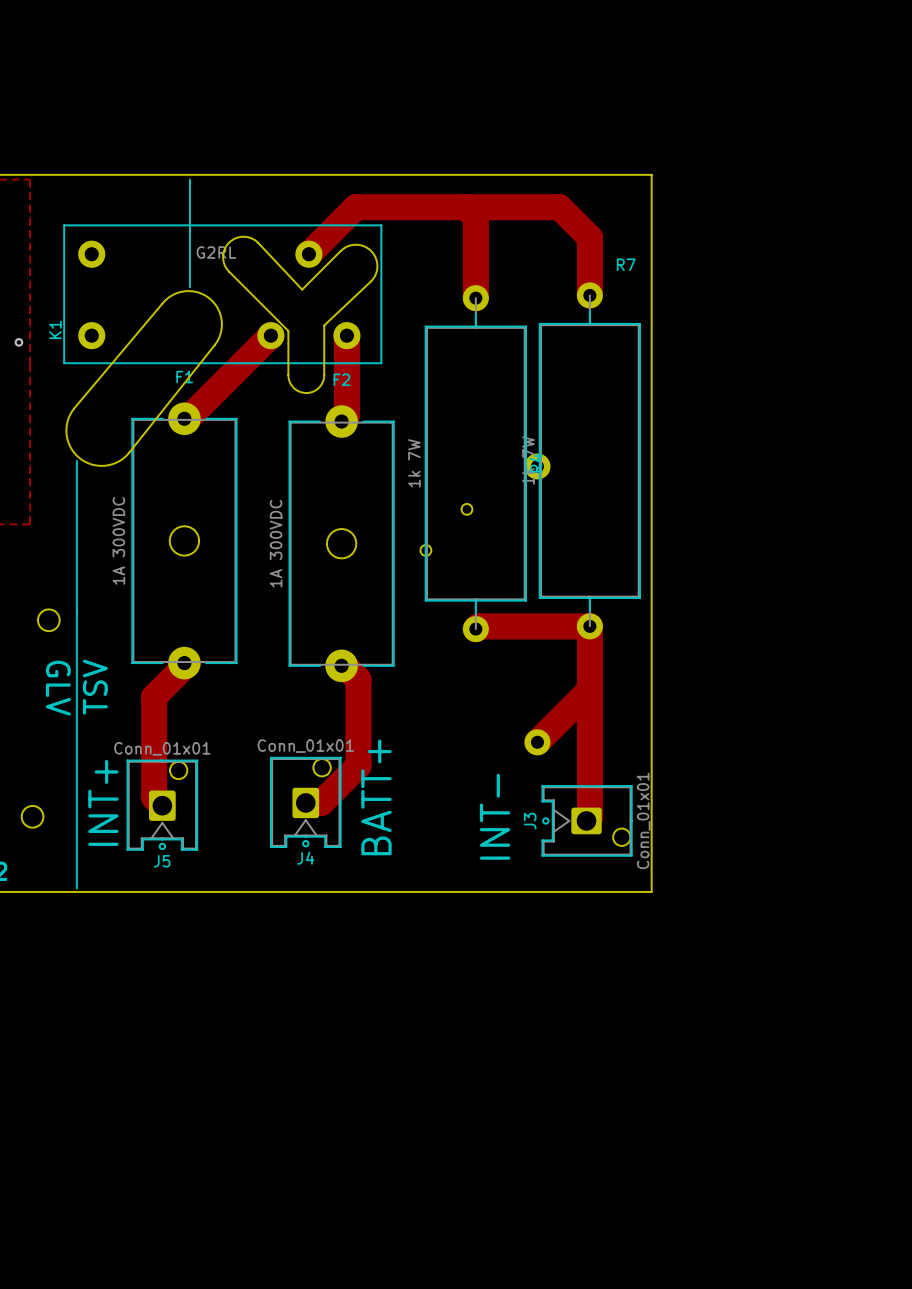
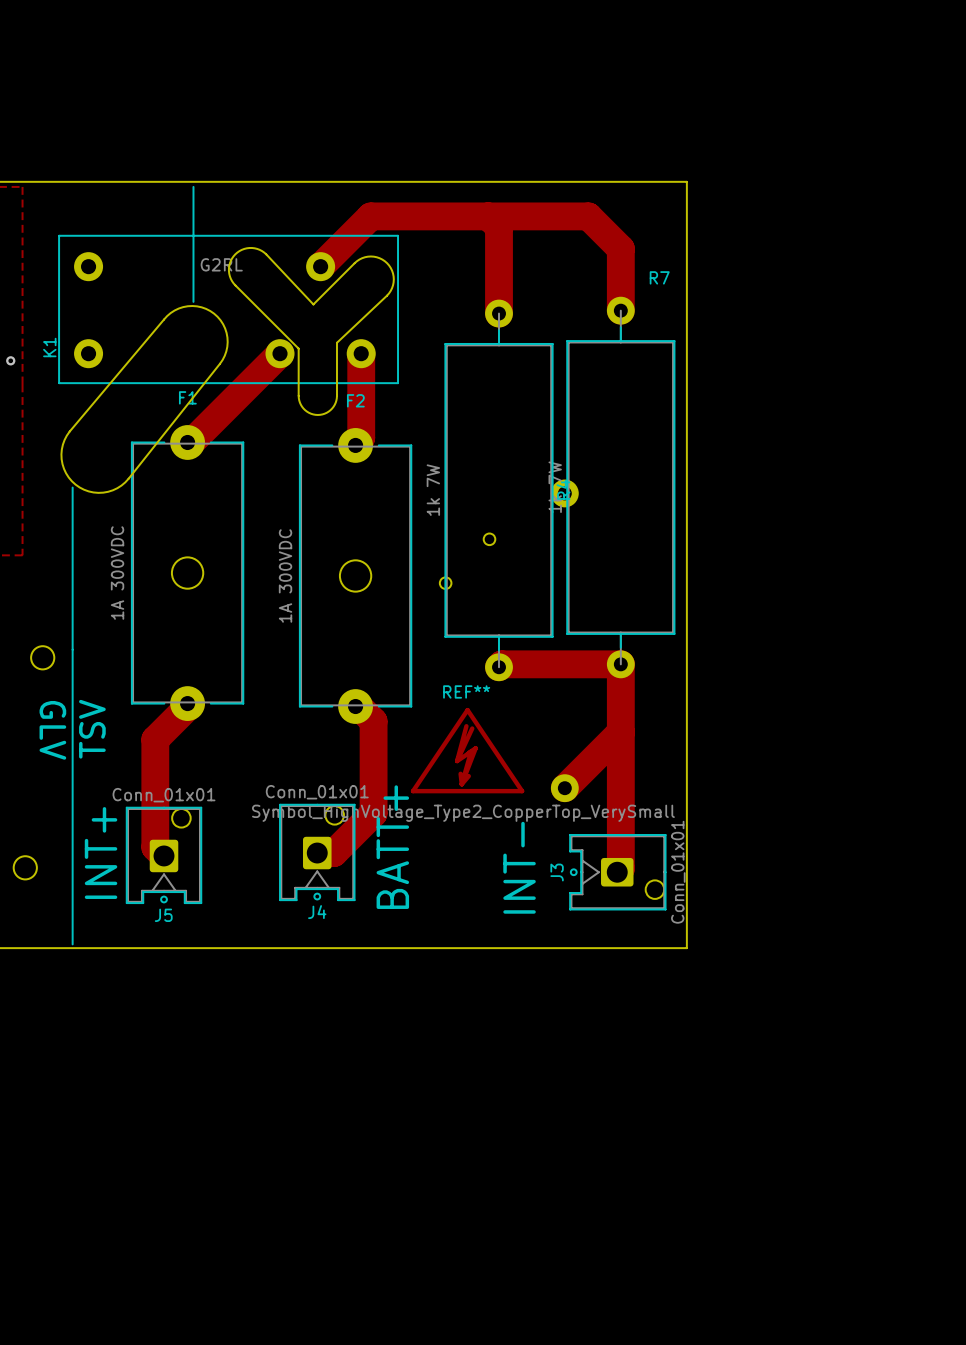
REF**: none -> Symbol_HighVoltage_Type2_CopperTop_VerySmall (467, 750)

